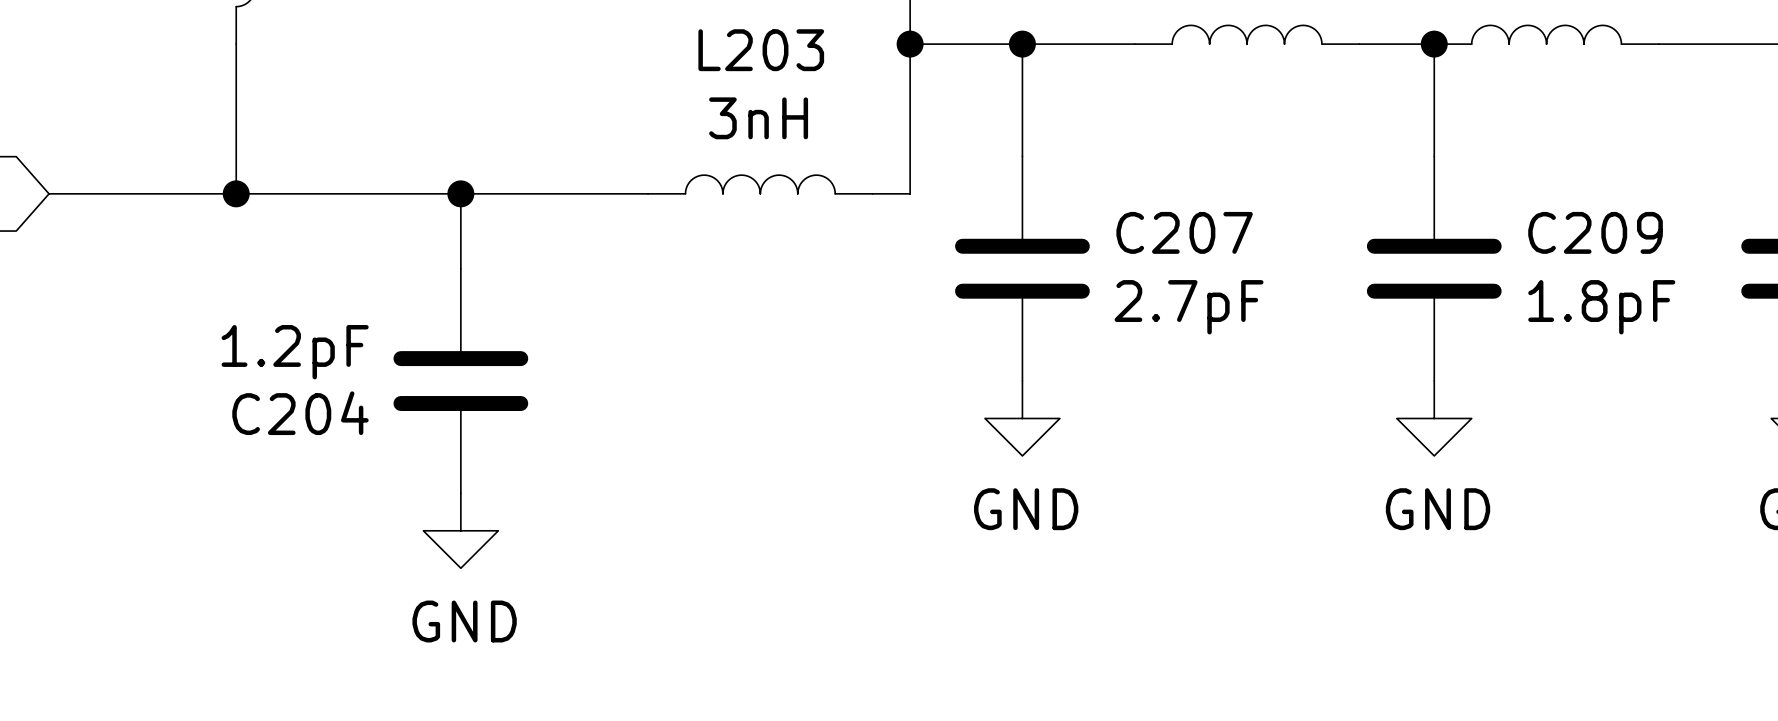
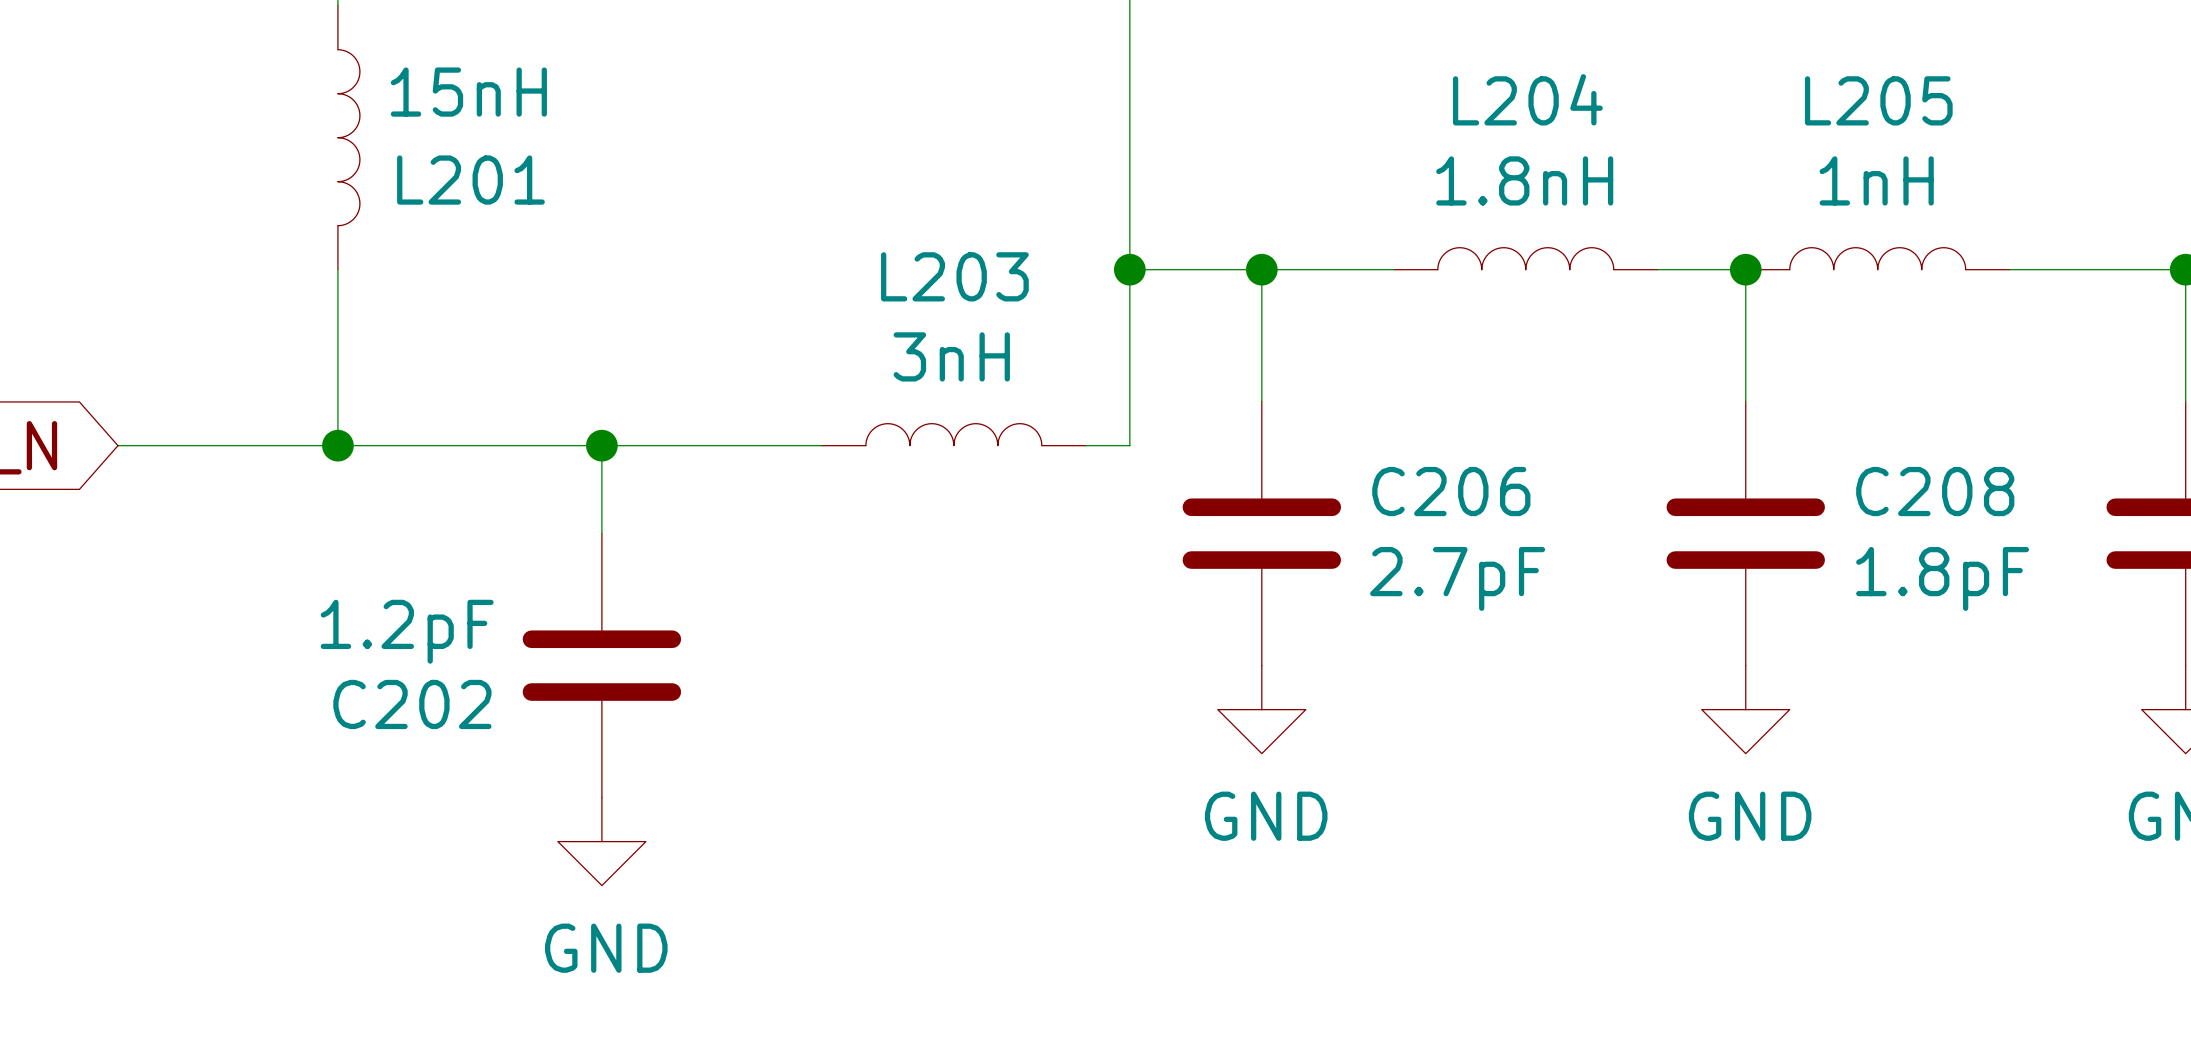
C207 name: C207 (1184, 232) -> C206 (1451, 491)
C209 name: C209 (1595, 232) -> C208 (1935, 491)
C204 name: C204 (300, 413) -> C202 (412, 704)

